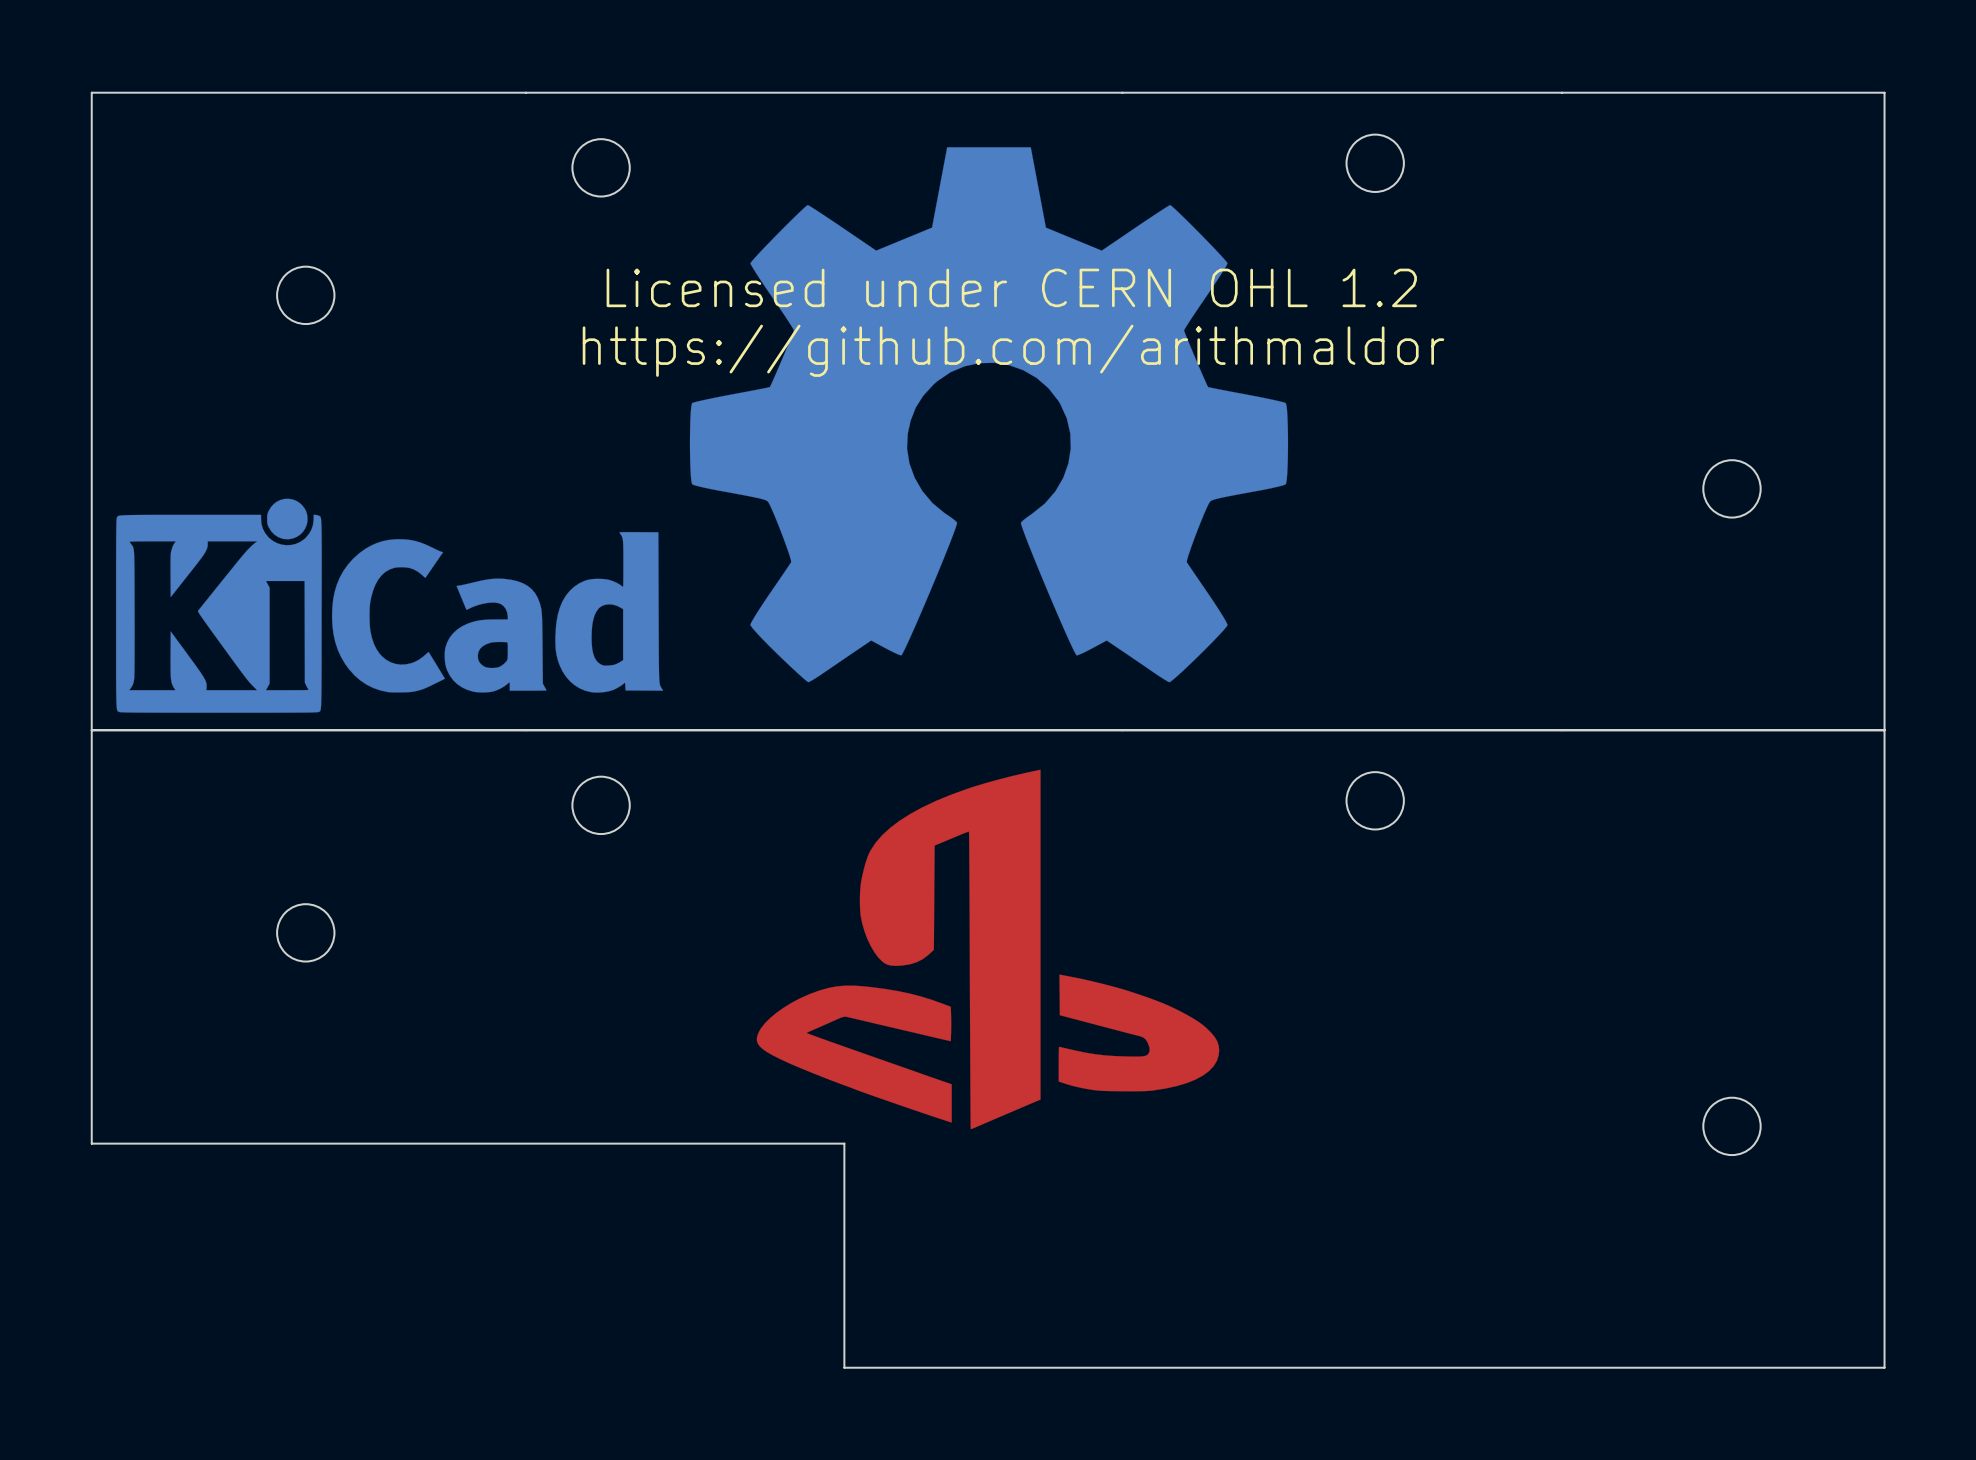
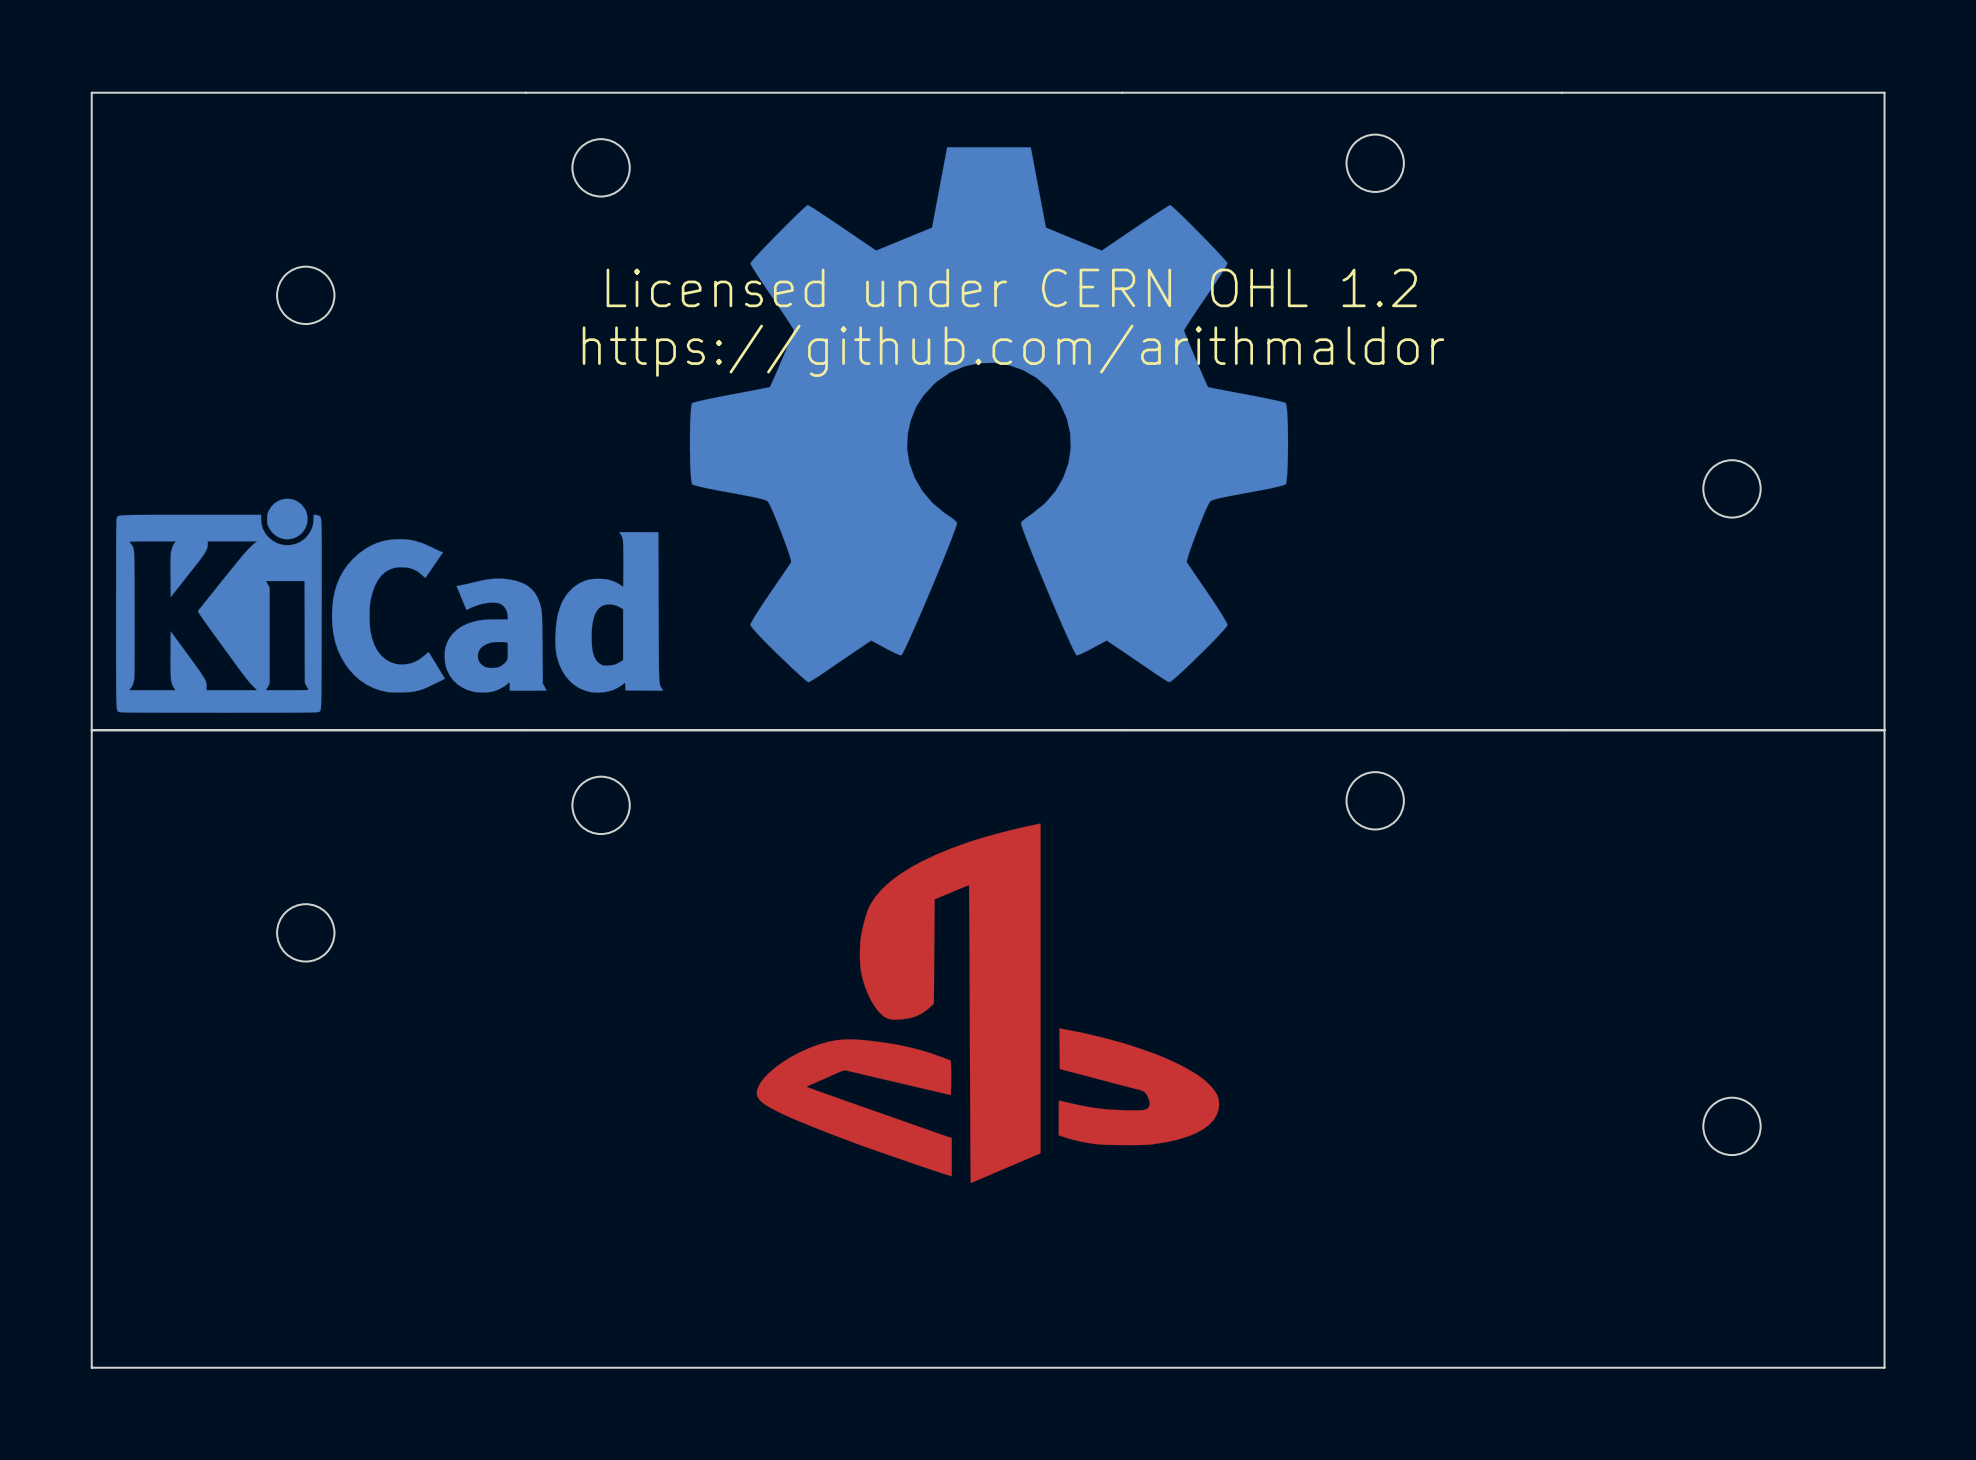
drawing position: (988, 949) -> (988, 1003)
board edge: (91, 1143) (844, 1143) (844, 1367) -> (91, 1143) (91, 1367) (844, 1367)

